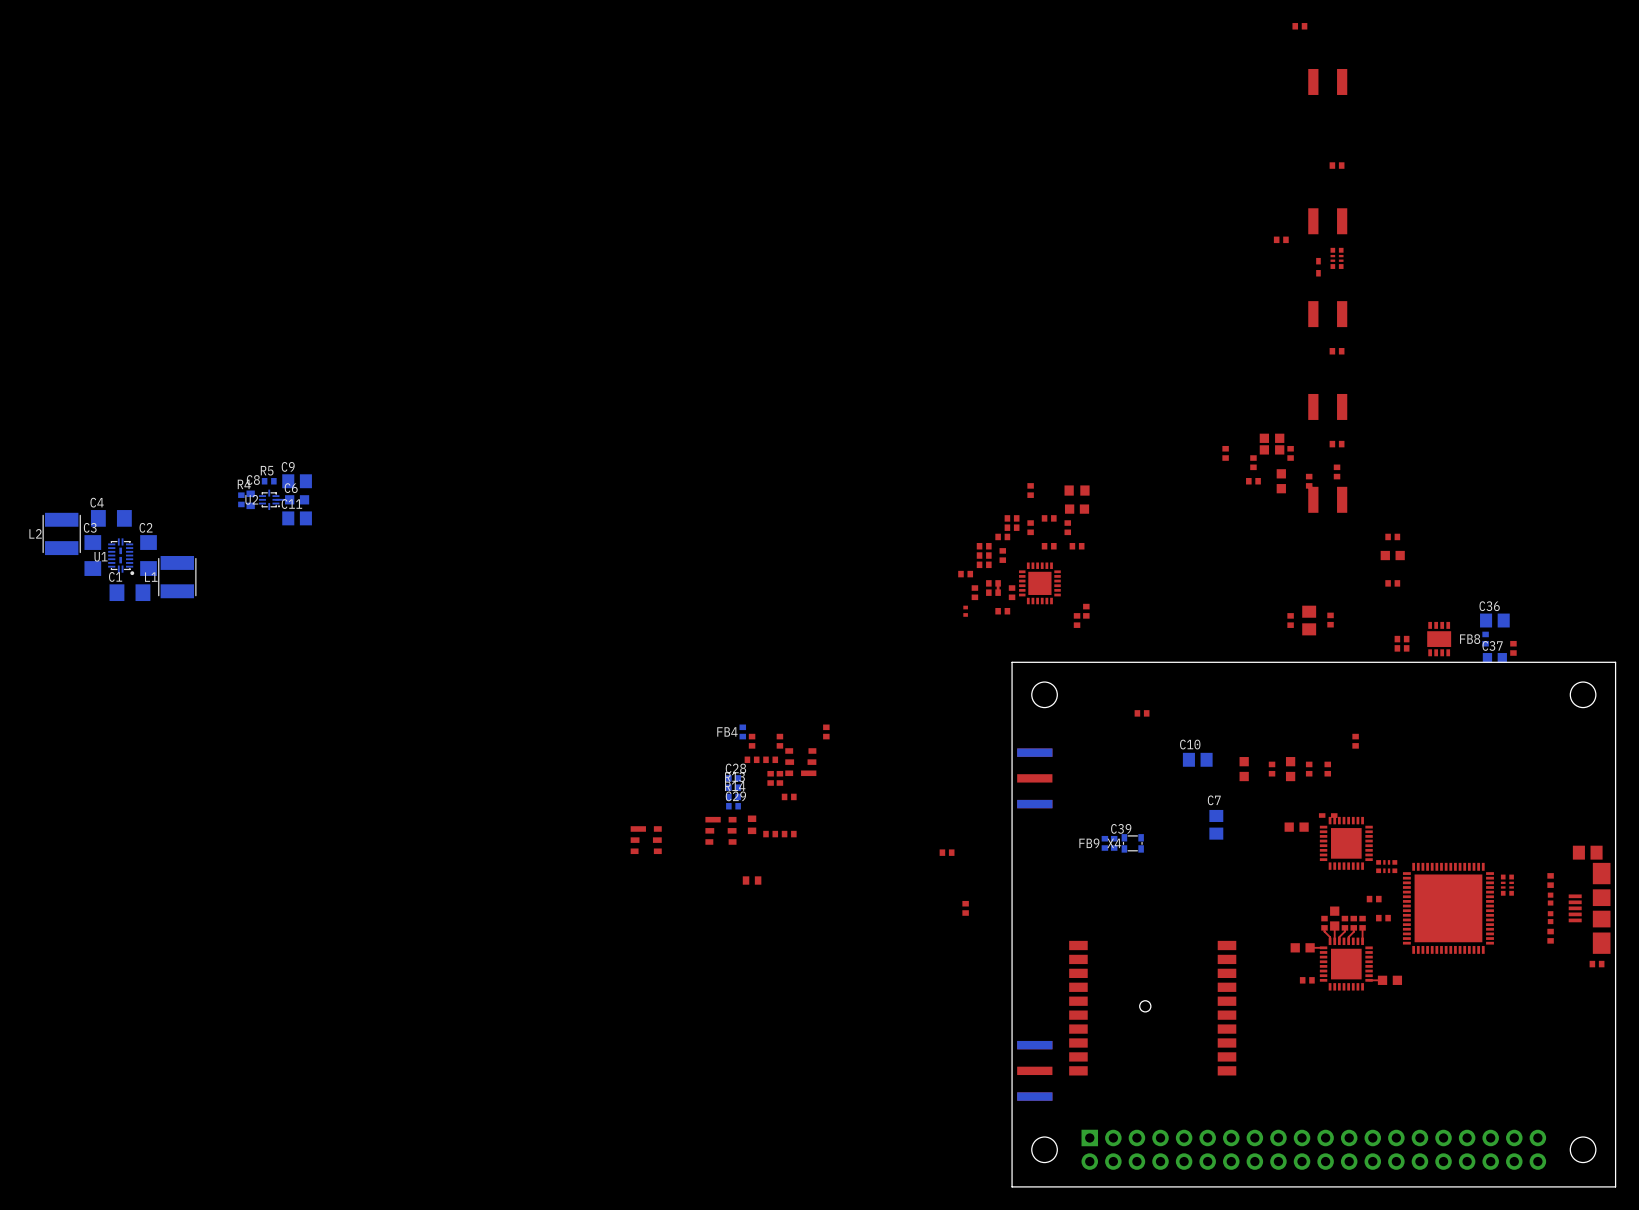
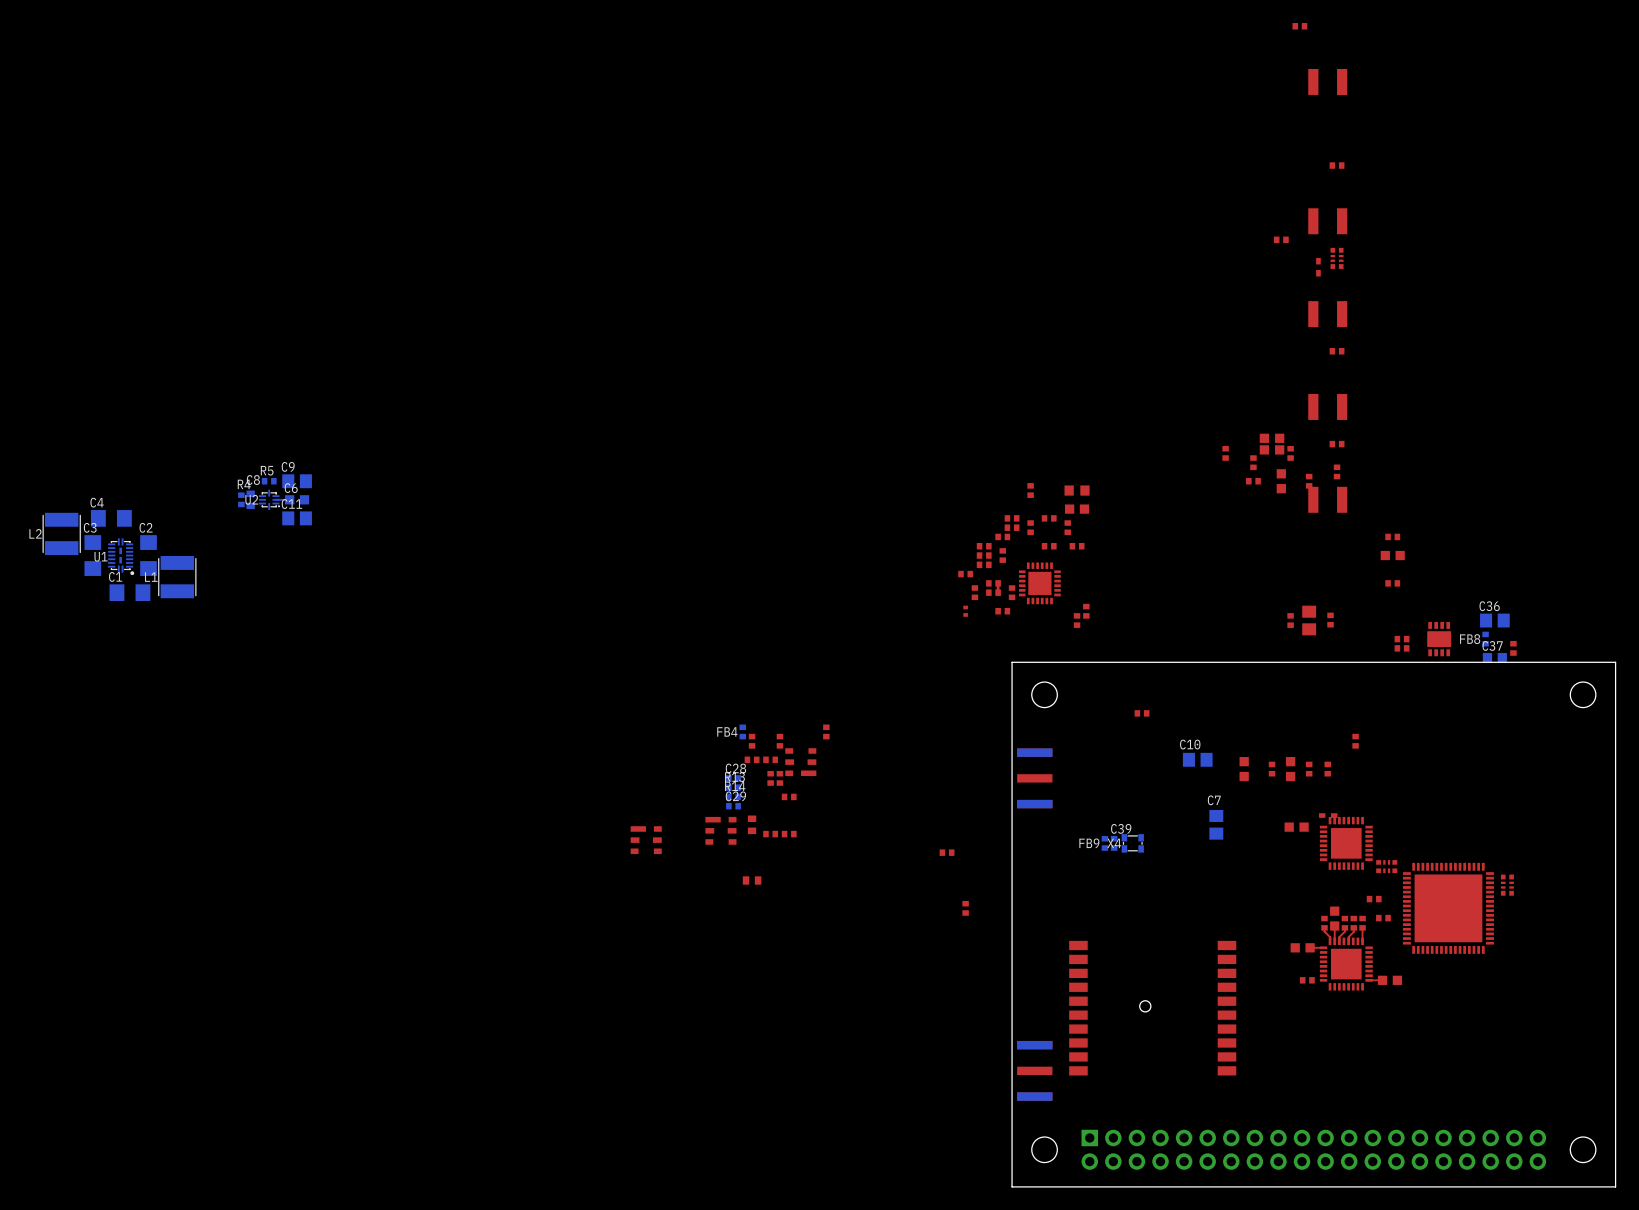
part: (1587, 852) -> none
part: (1550, 880) -> none
part: (1550, 899) -> none
part: (1589, 908) -> none
part: (1550, 917) -> none
part: (1550, 936) -> none
part: (1597, 964) -> none

